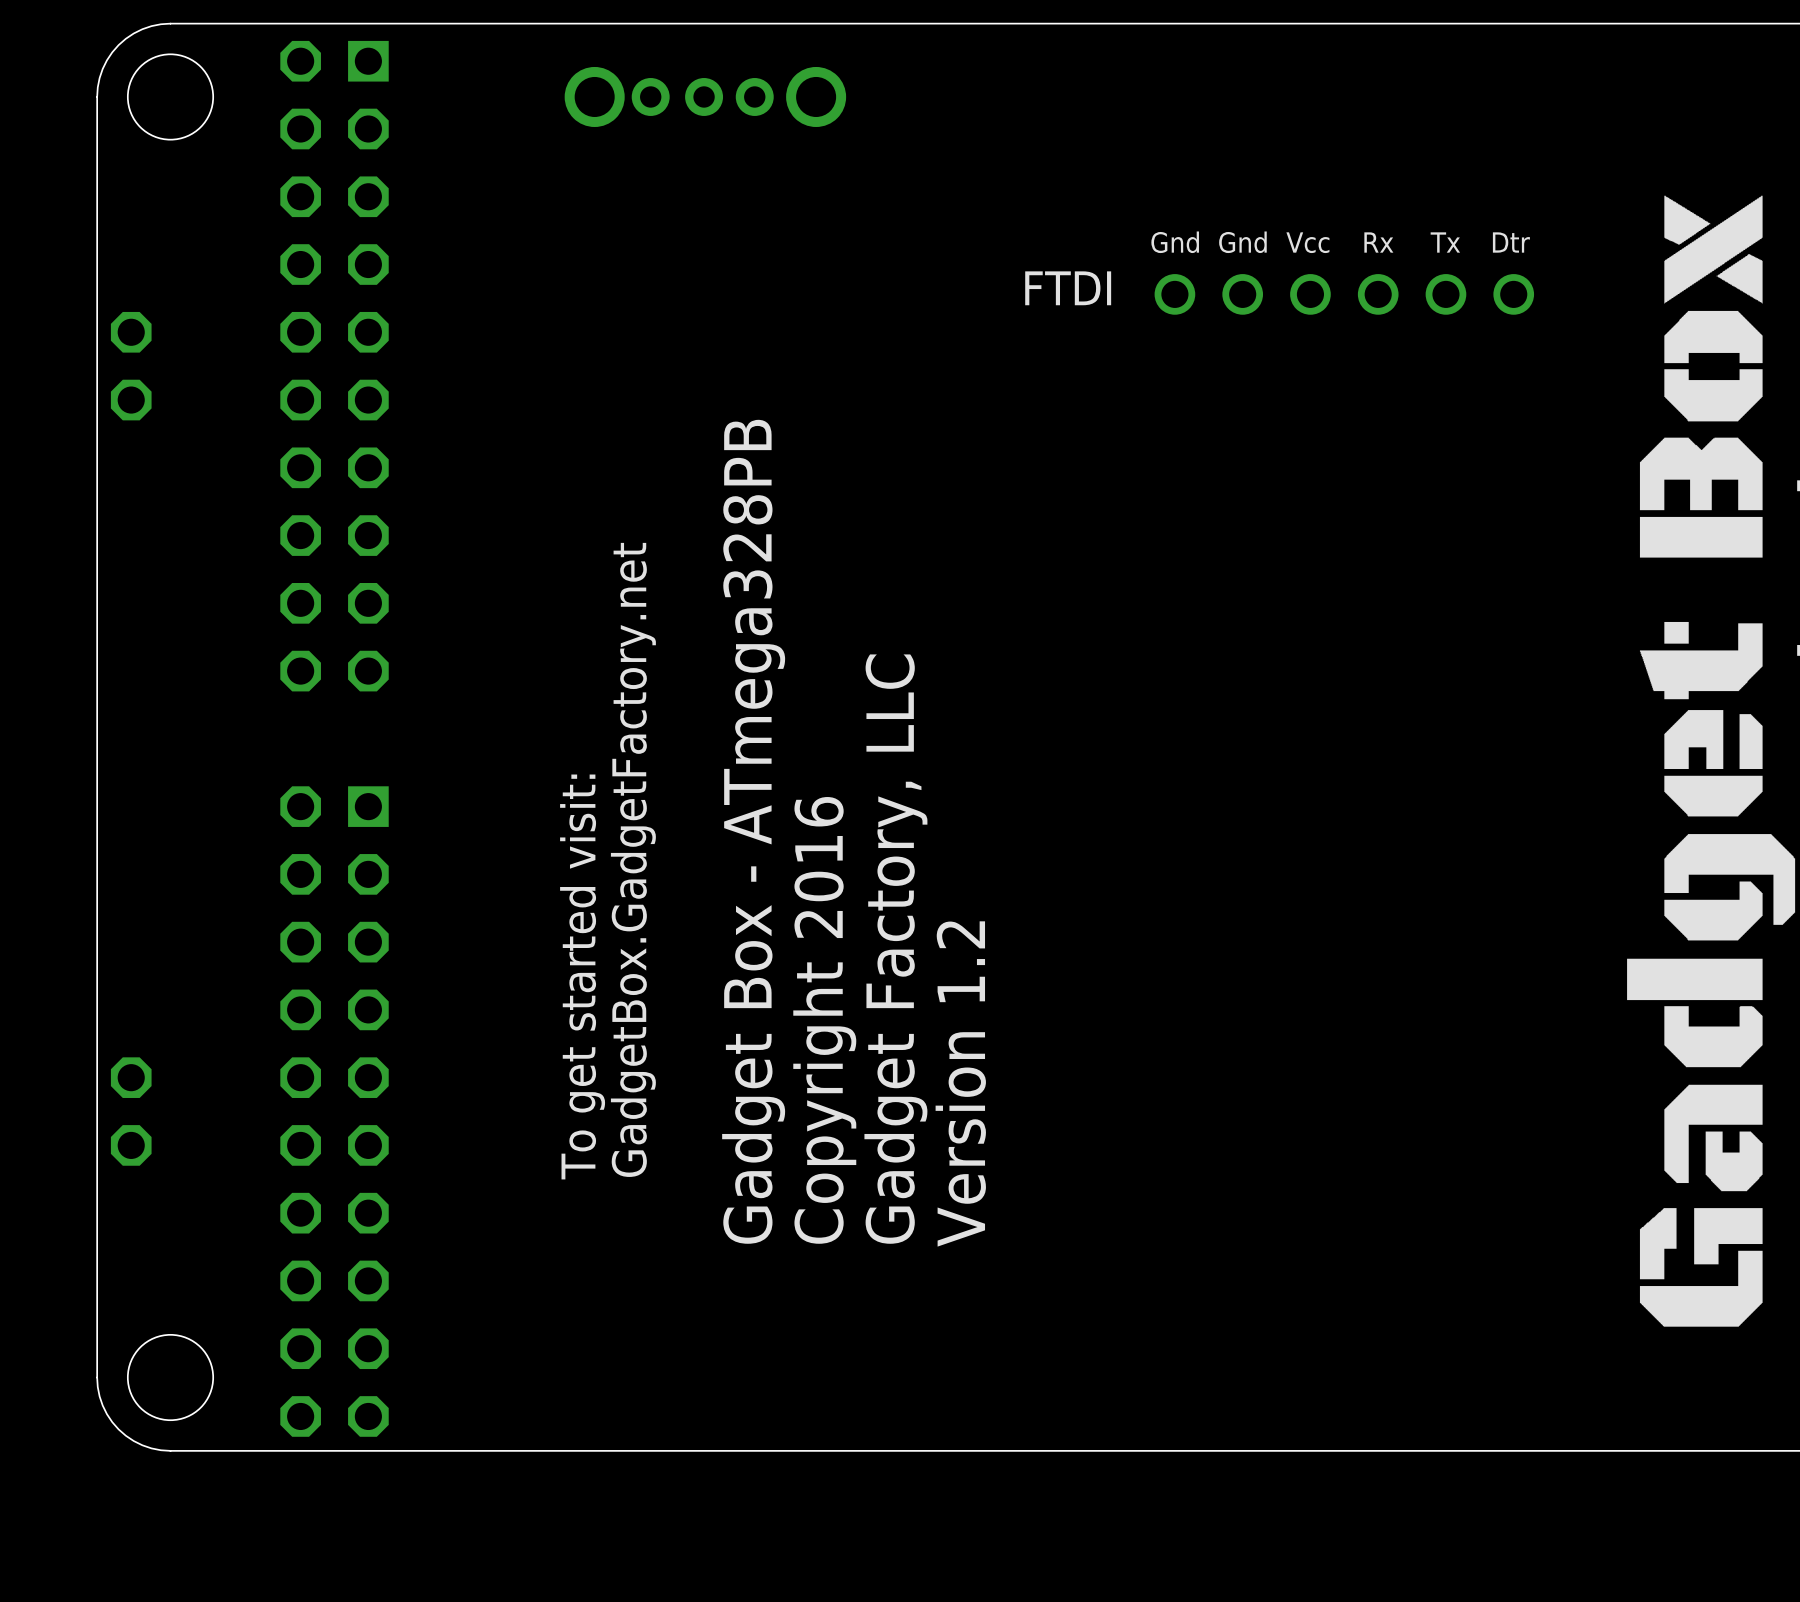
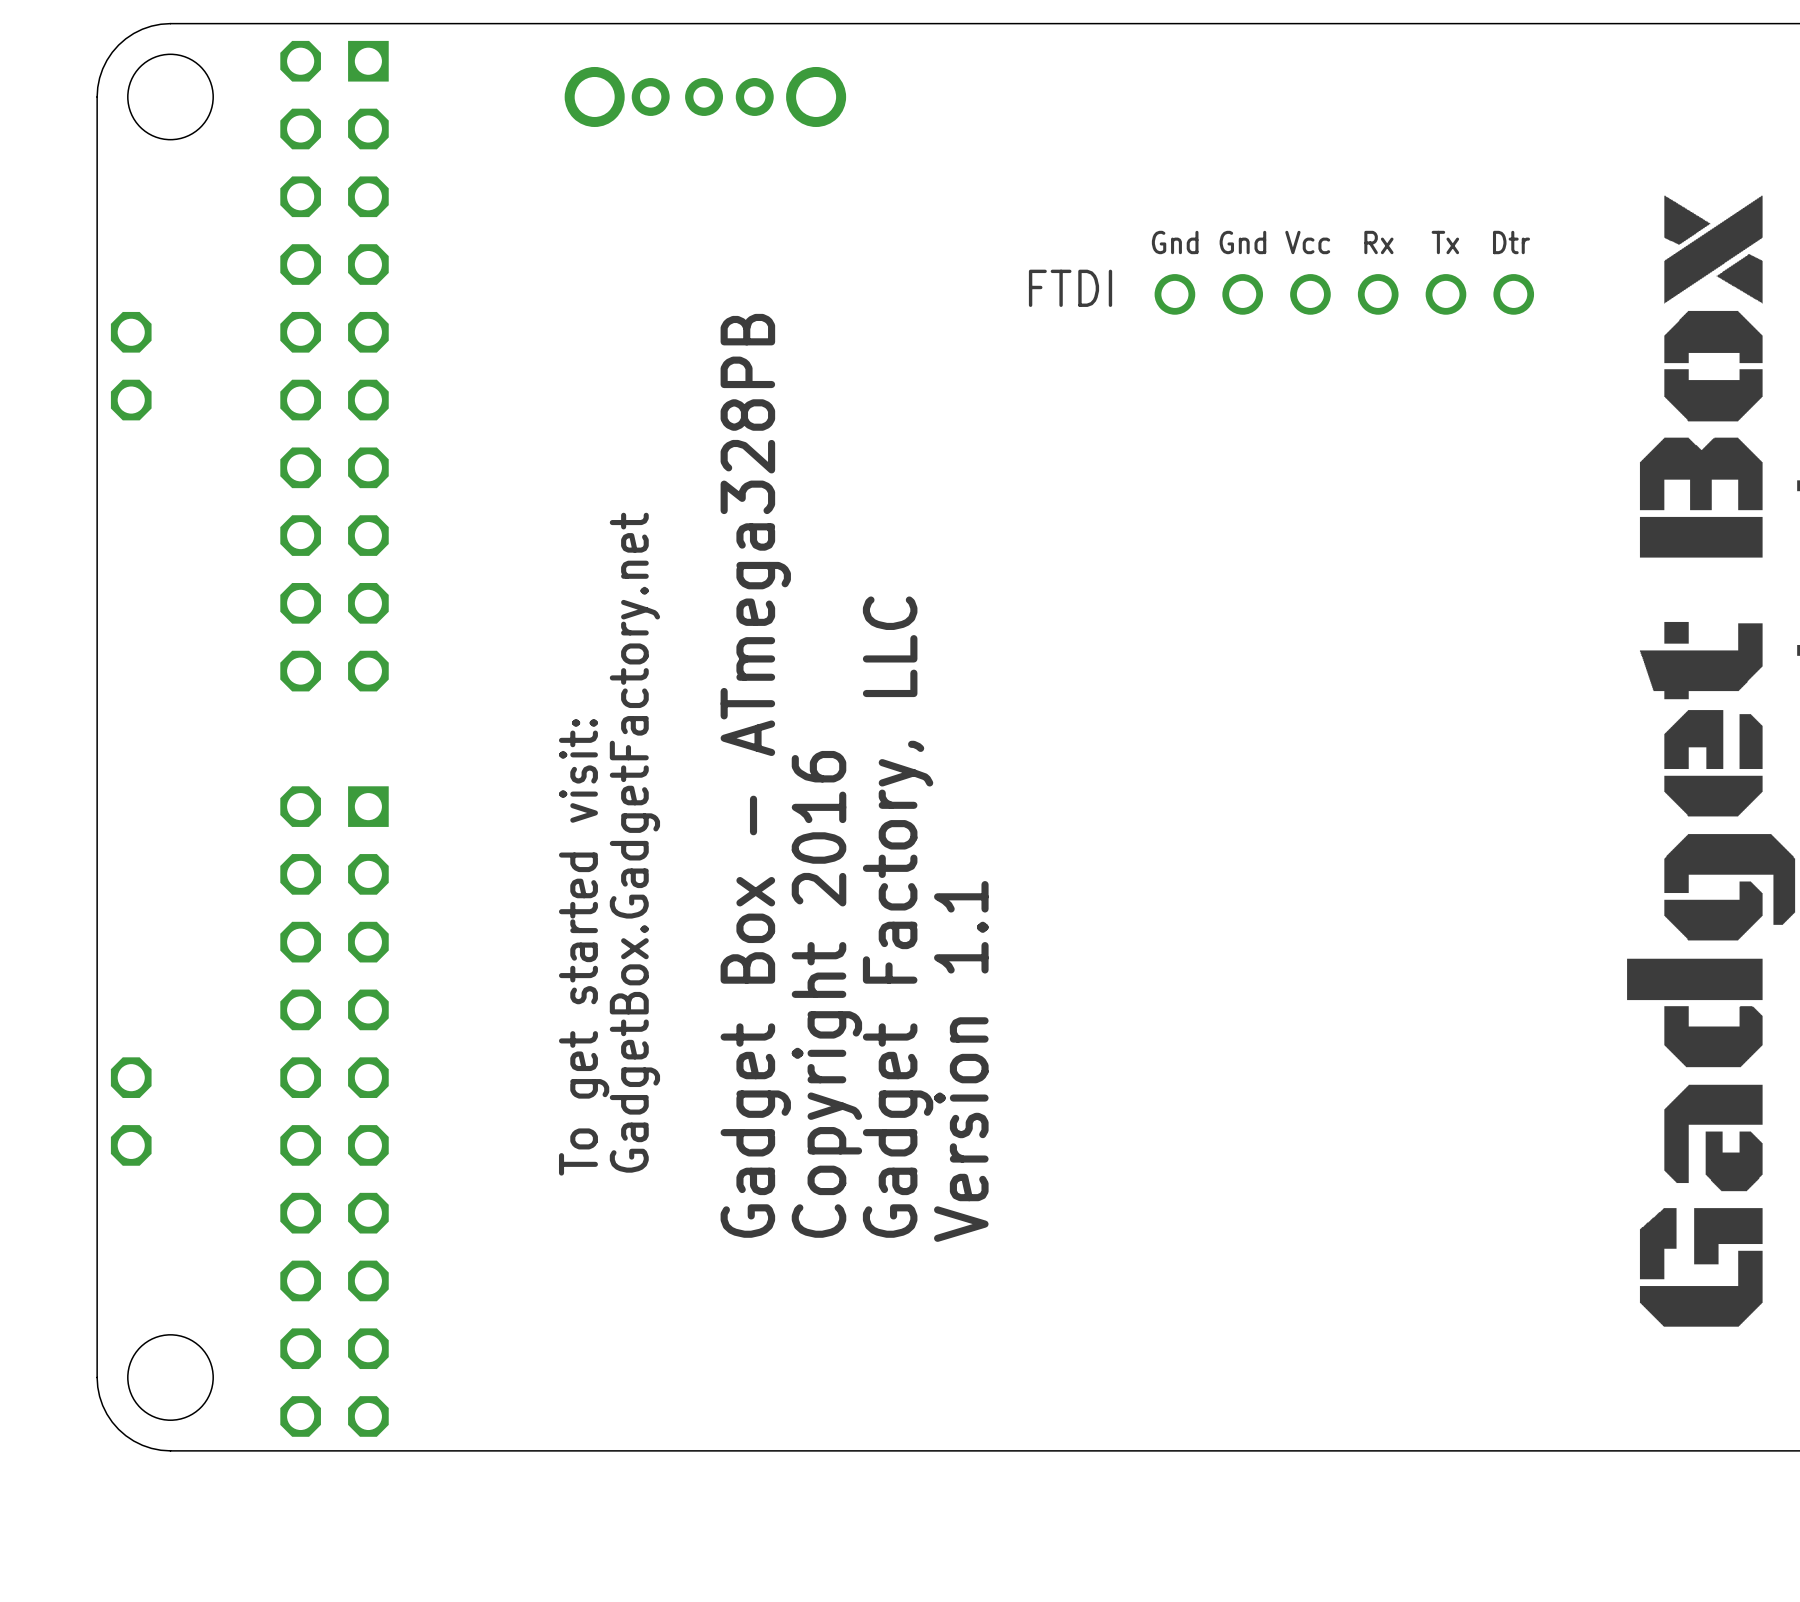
text: Version 1.2 (960, 1083) -> Version 1.1 (961, 1061)

